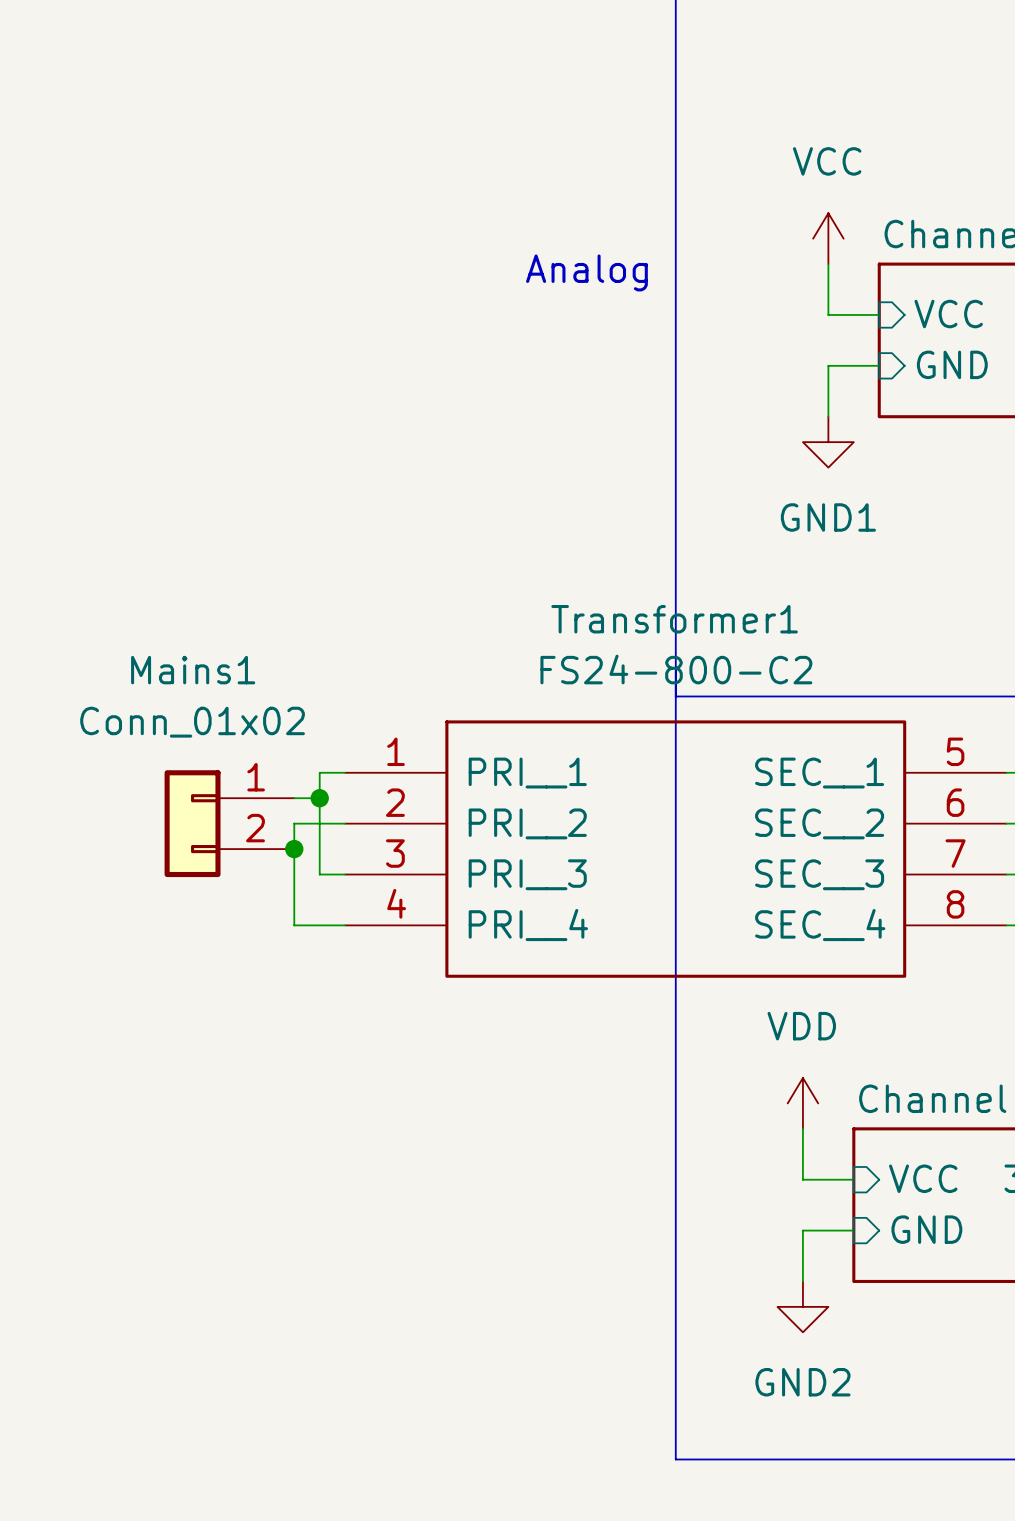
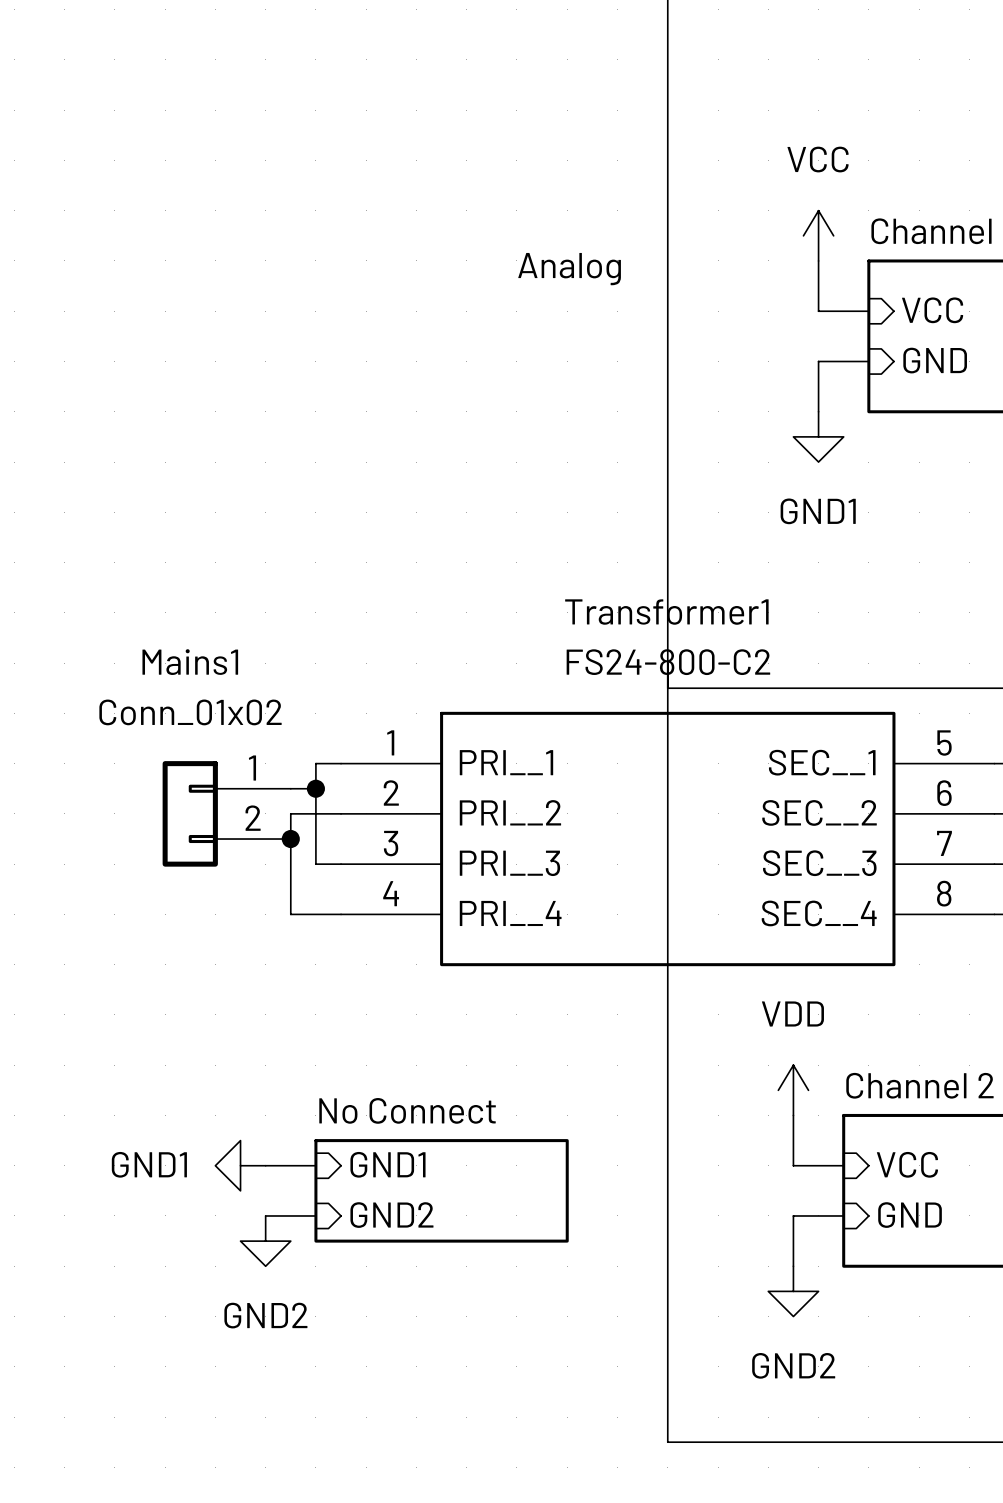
sheet pin: none -> GND1 (387, 1164)
power symbol: none -> GND1 (240, 1165)
wire: none -> (265, 1165) (315, 1165)
sheet No Connect: none -> (441, 1190)
sheet pin: none -> GND2 (391, 1215)
wire: none -> (265, 1215) (315, 1215)
power symbol: none -> GND2 (265, 1241)

